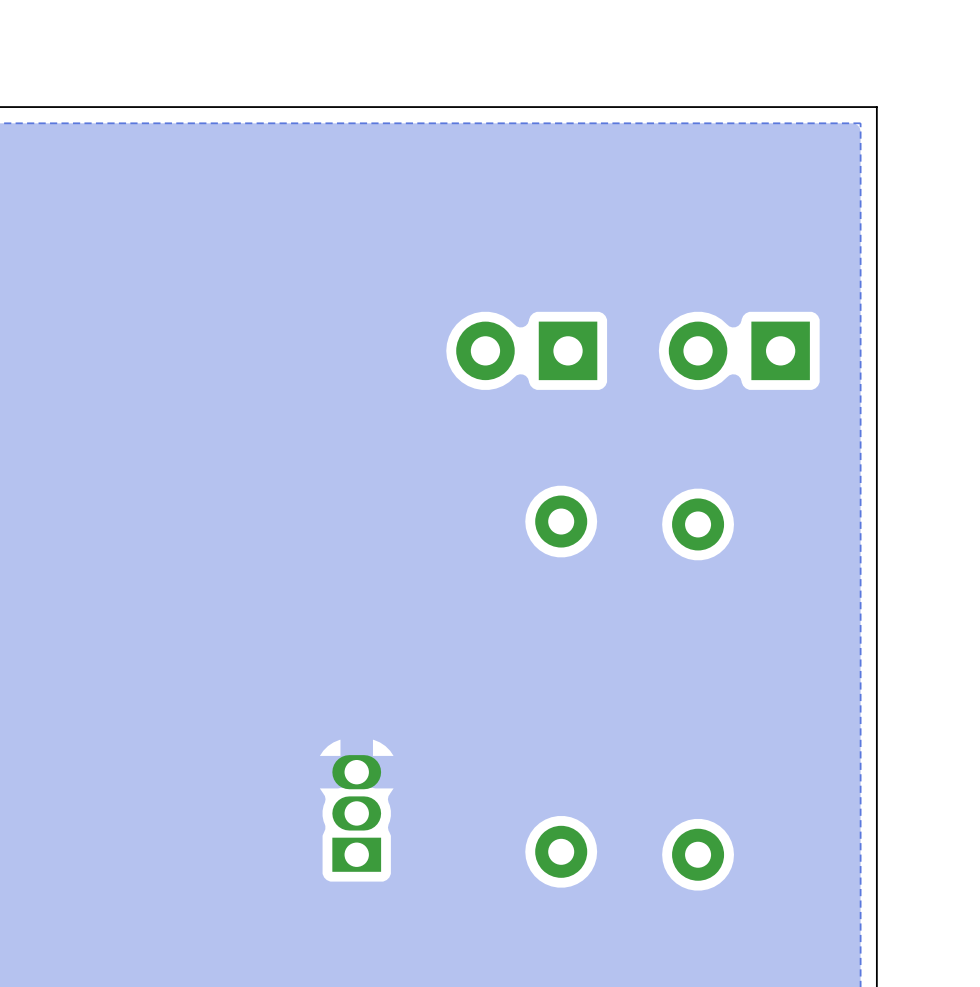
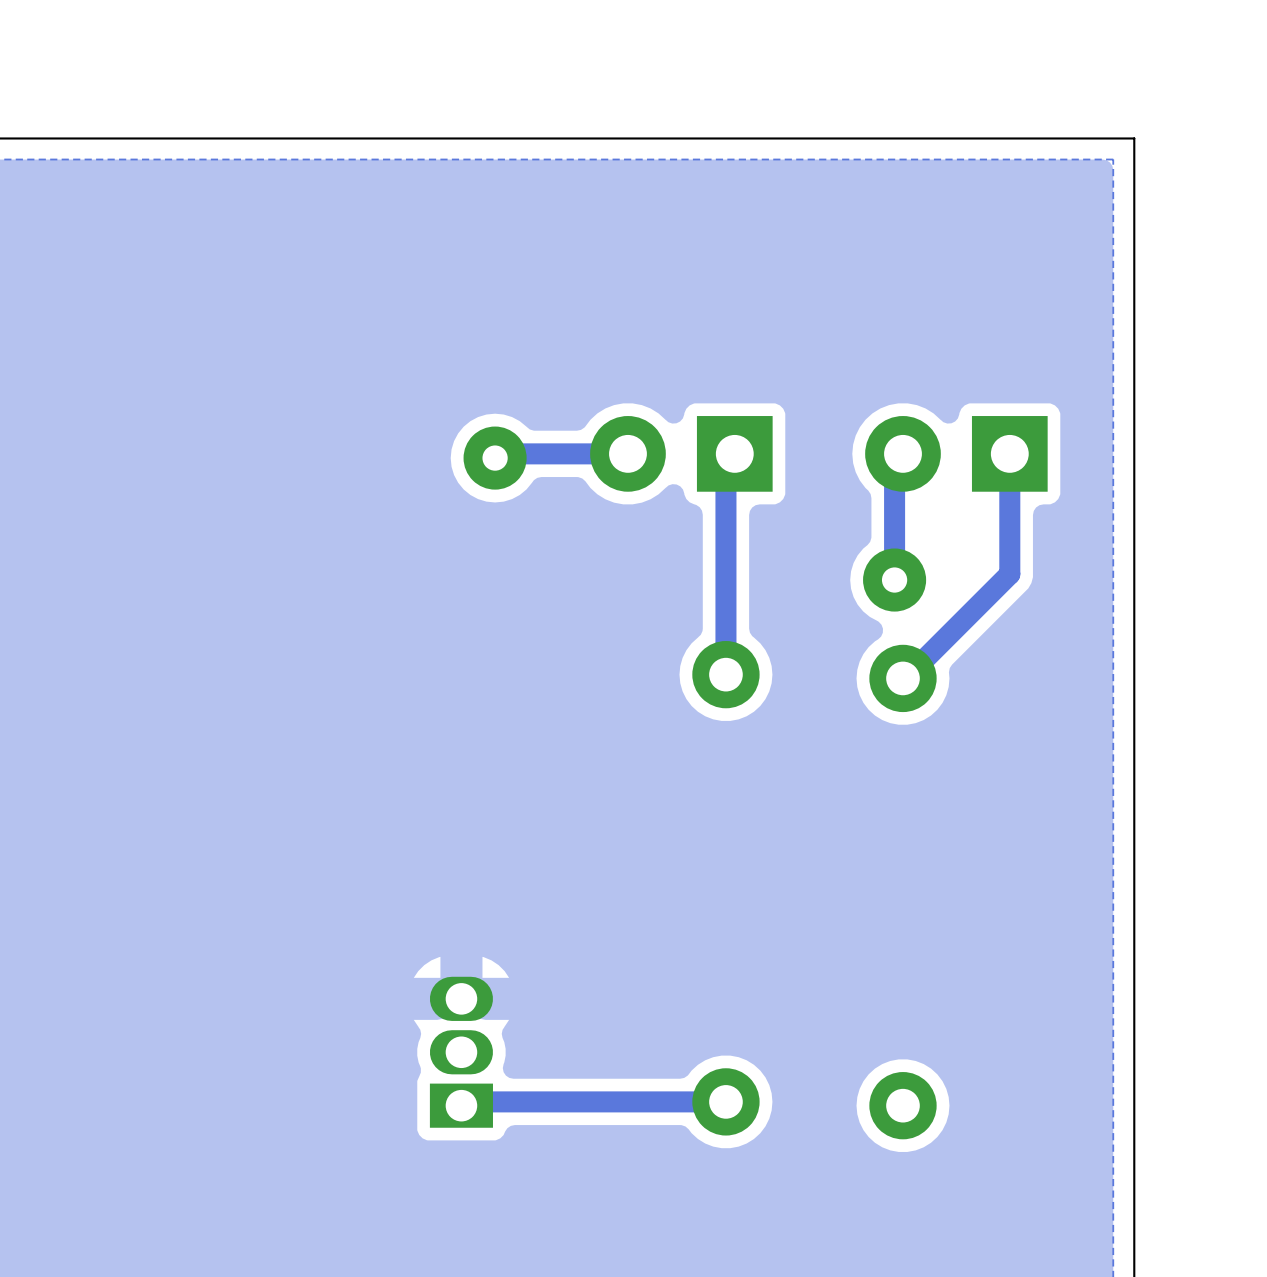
track: none -> (627, 453) (499, 453) (495, 458)
track: none -> (734, 453) (725, 462) (725, 674)
track: none -> (902, 453) (894, 462) (894, 580)
track: none -> (1009, 453) (1009, 574) (905, 678) (902, 678)
via: none -> (495, 458)
via: none -> (894, 580)
track: none -> (725, 1101) (465, 1101) (461, 1105)

